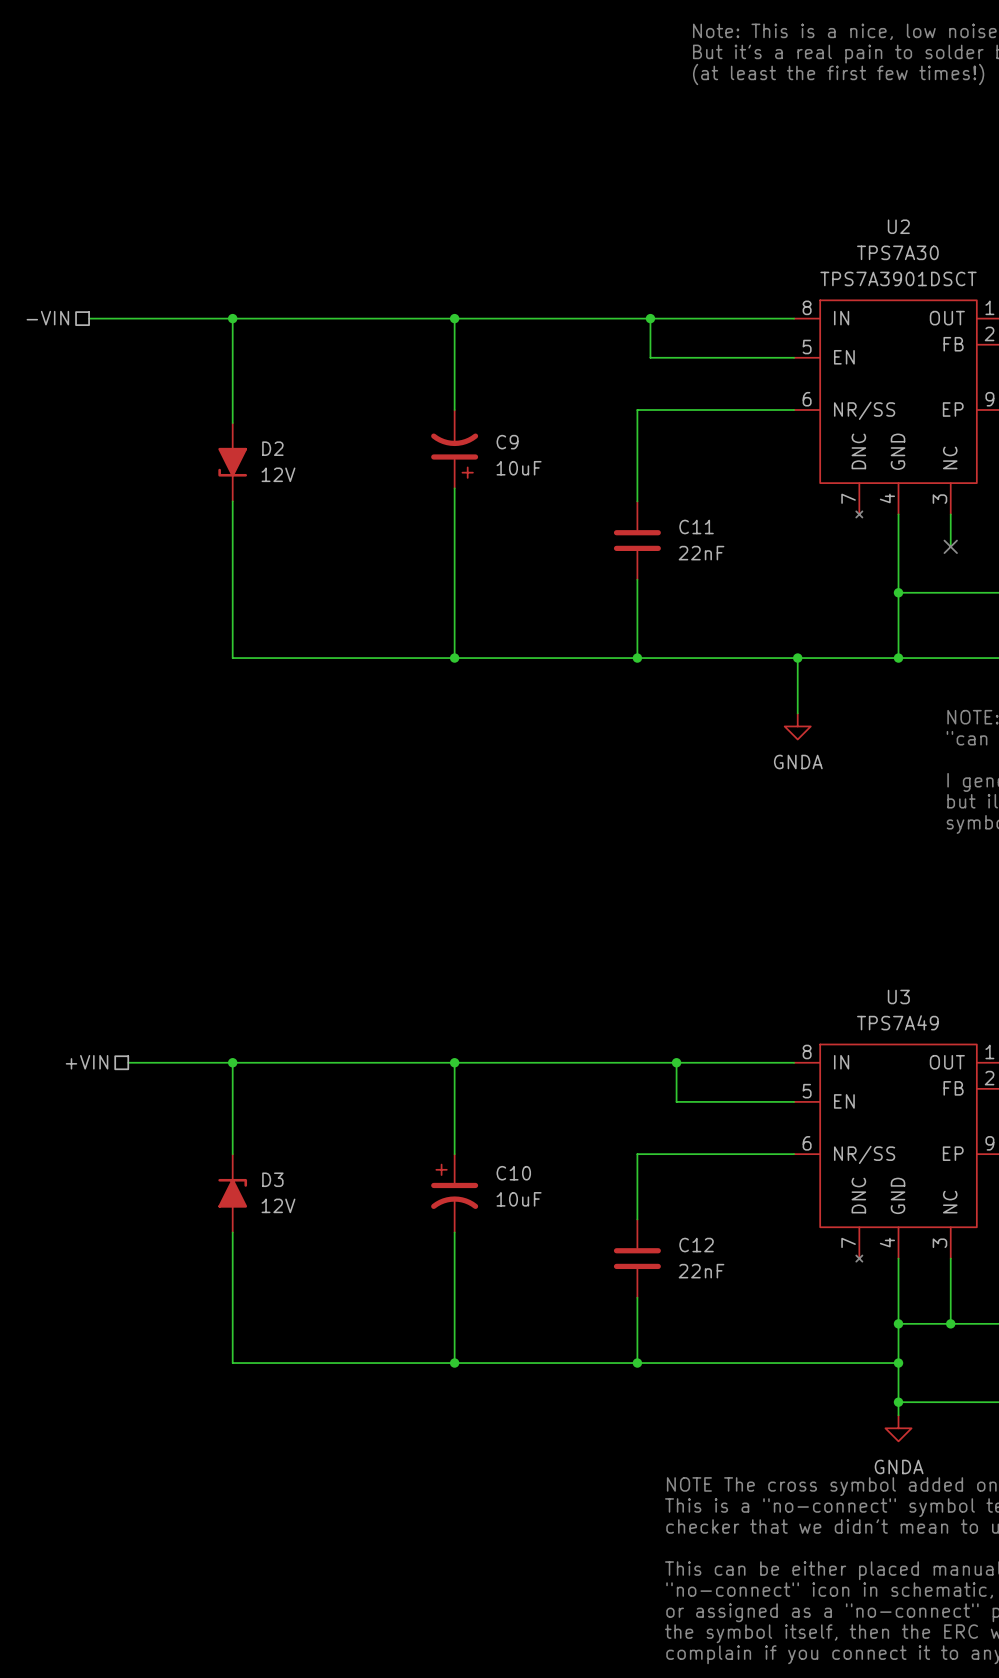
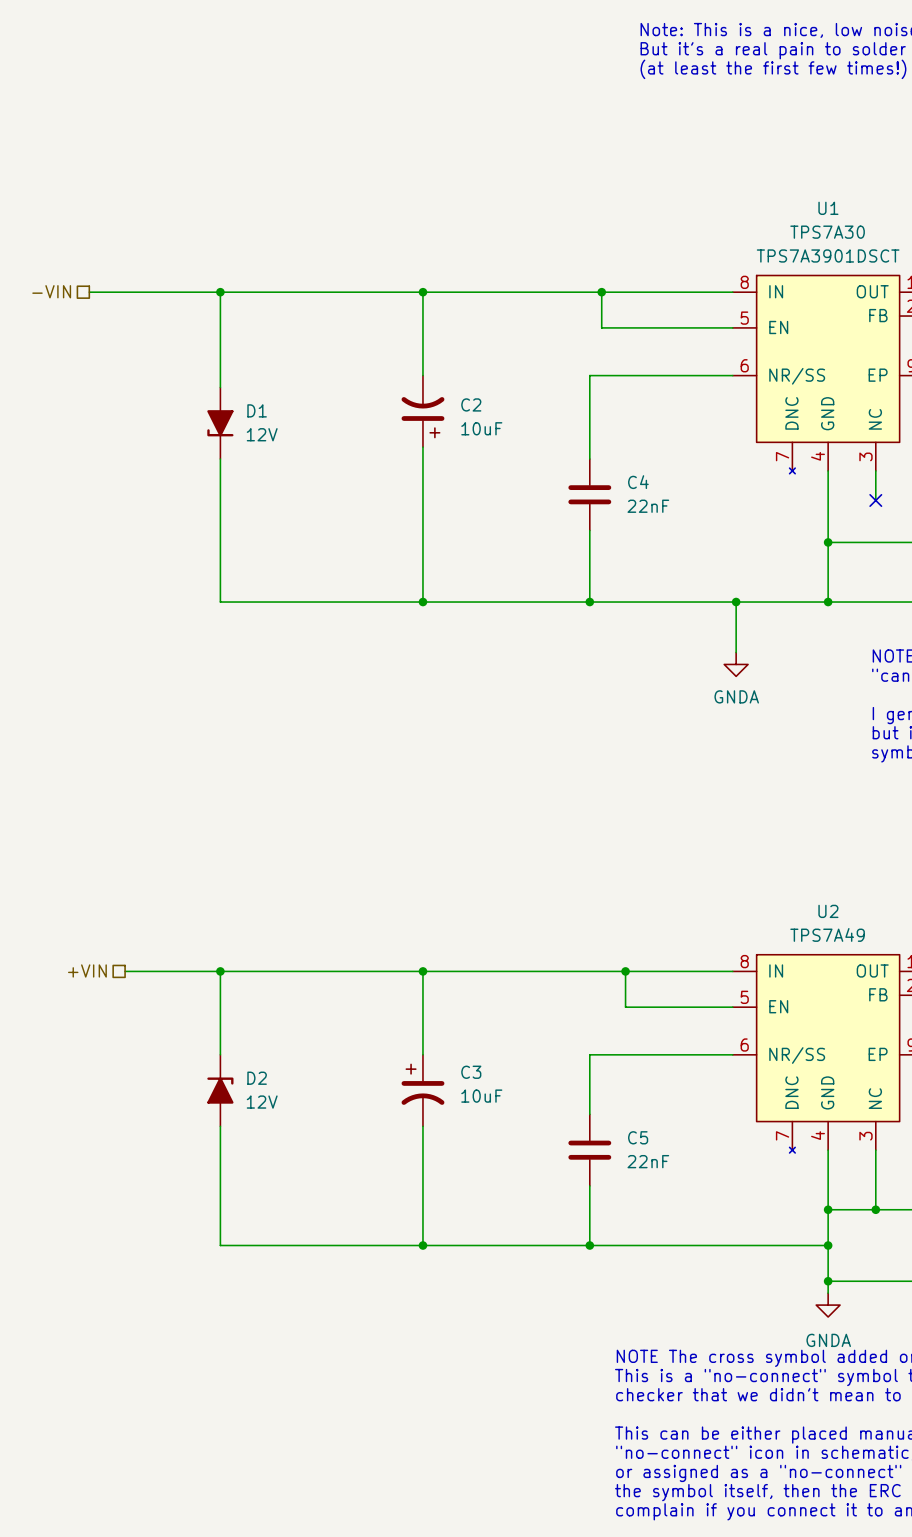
U2 name: U2 (898, 226) -> U1 (828, 208)
C9 name: C9 (507, 442) -> C2 (471, 404)
D2 name: D2 (272, 448) -> D1 (257, 410)
C11 name: C11 (696, 527) -> C4 (638, 482)
U3 name: U3 (898, 996) -> U2 (828, 911)
C10 name: C10 (513, 1173) -> C3 (471, 1072)
D3 name: D3 (272, 1179) -> D2 (257, 1078)
C12 name: C12 (696, 1245) -> C5 (638, 1137)

